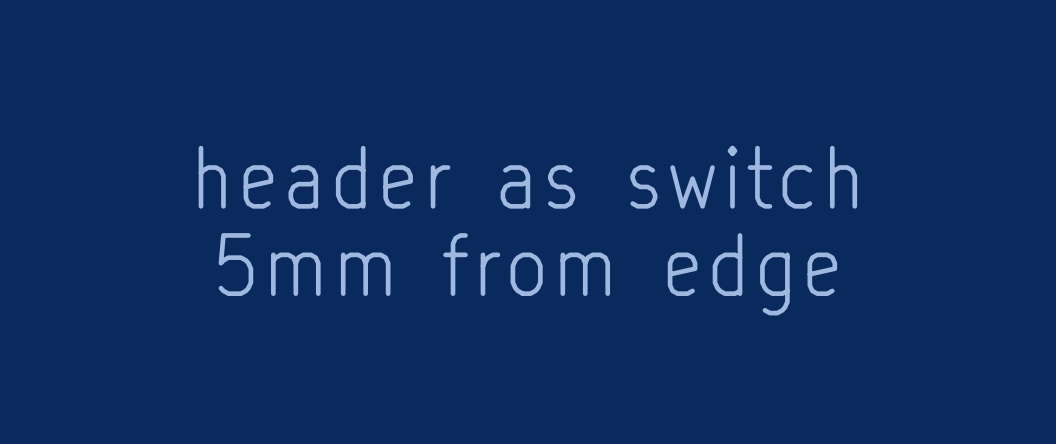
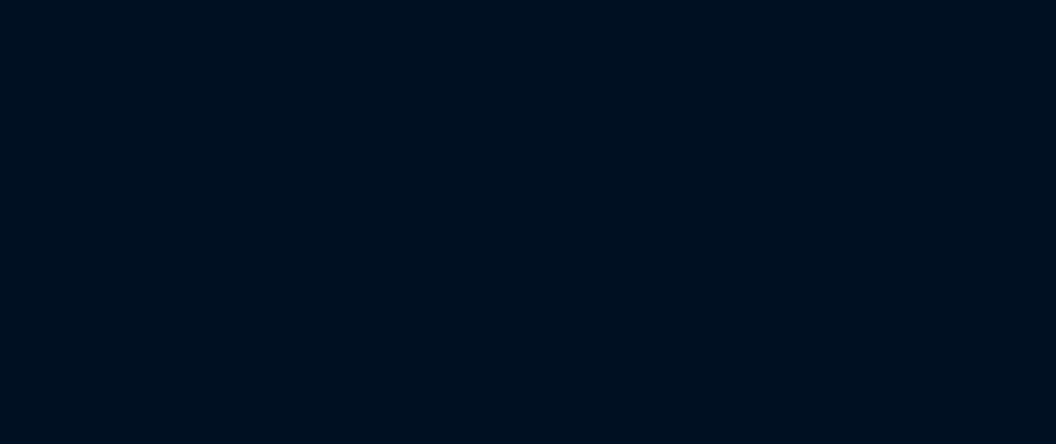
text: header as switch (527, 177) -> none
text: 5mm from edge (527, 274) -> none

